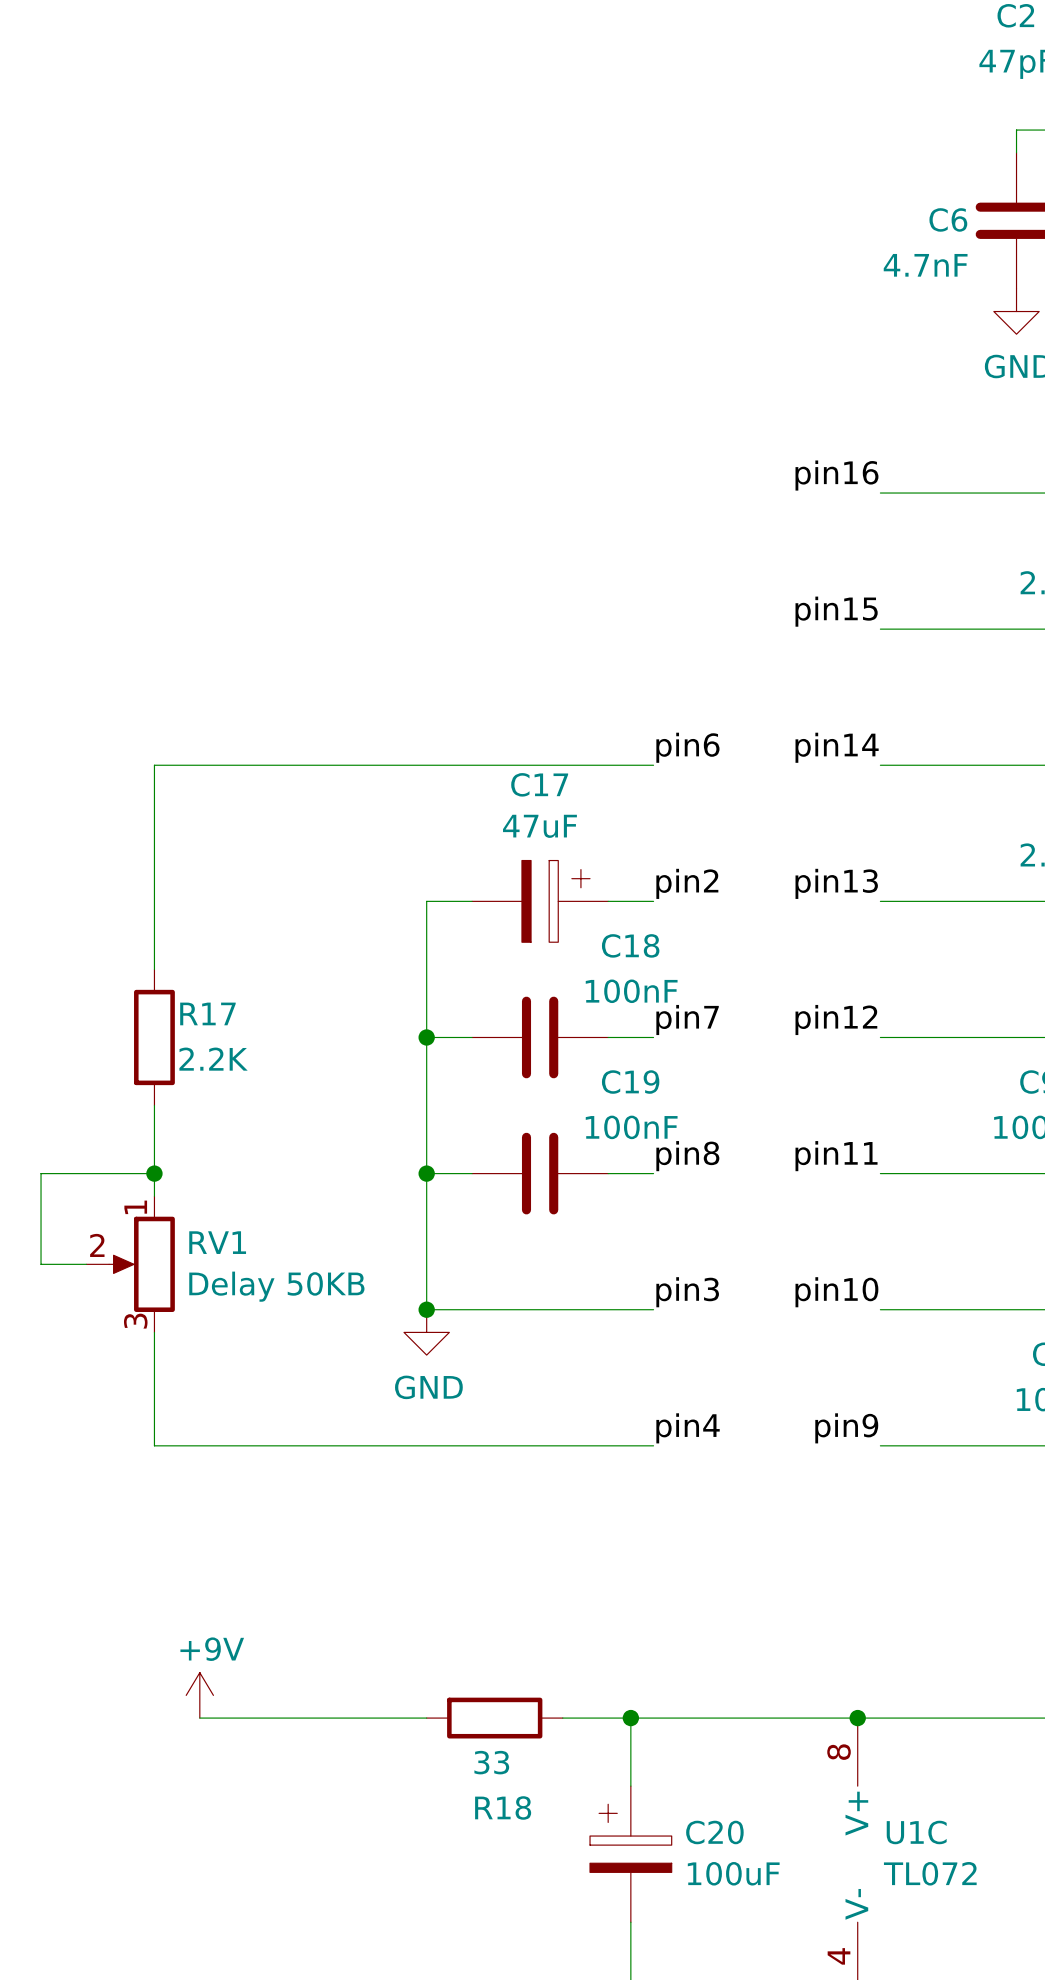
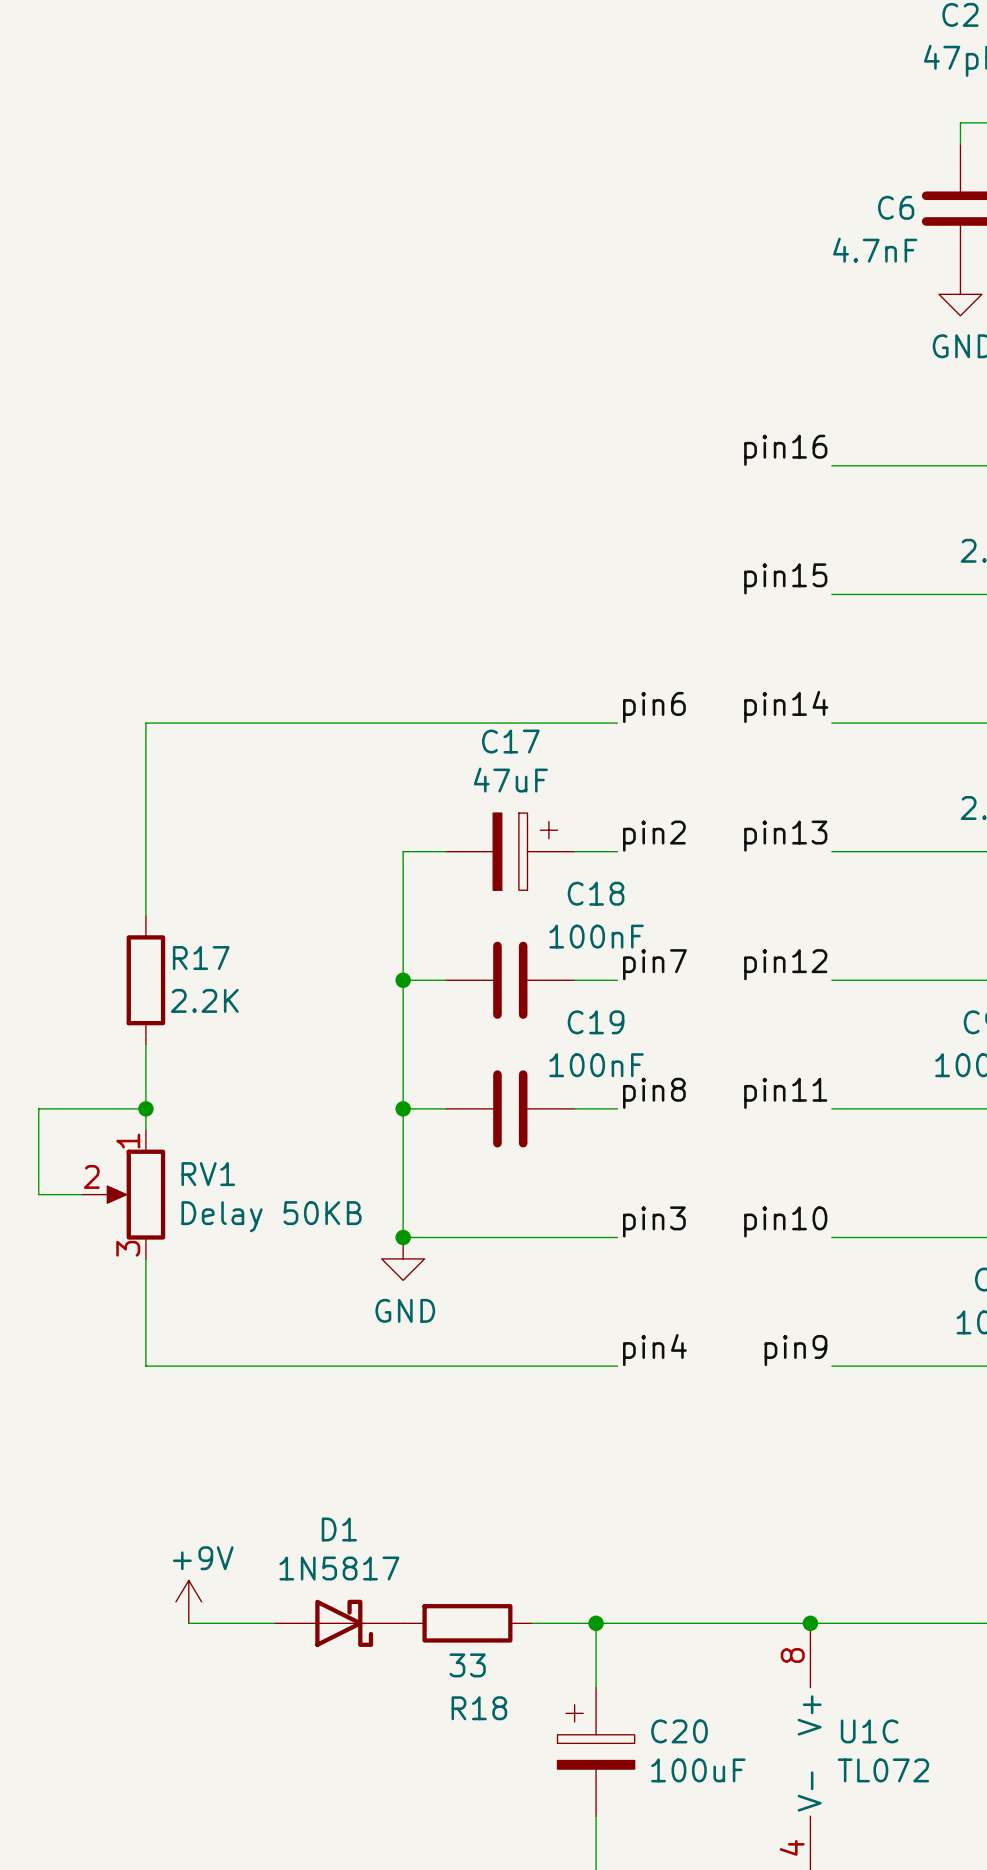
D1: none -> 1N5817 (338, 1623)

